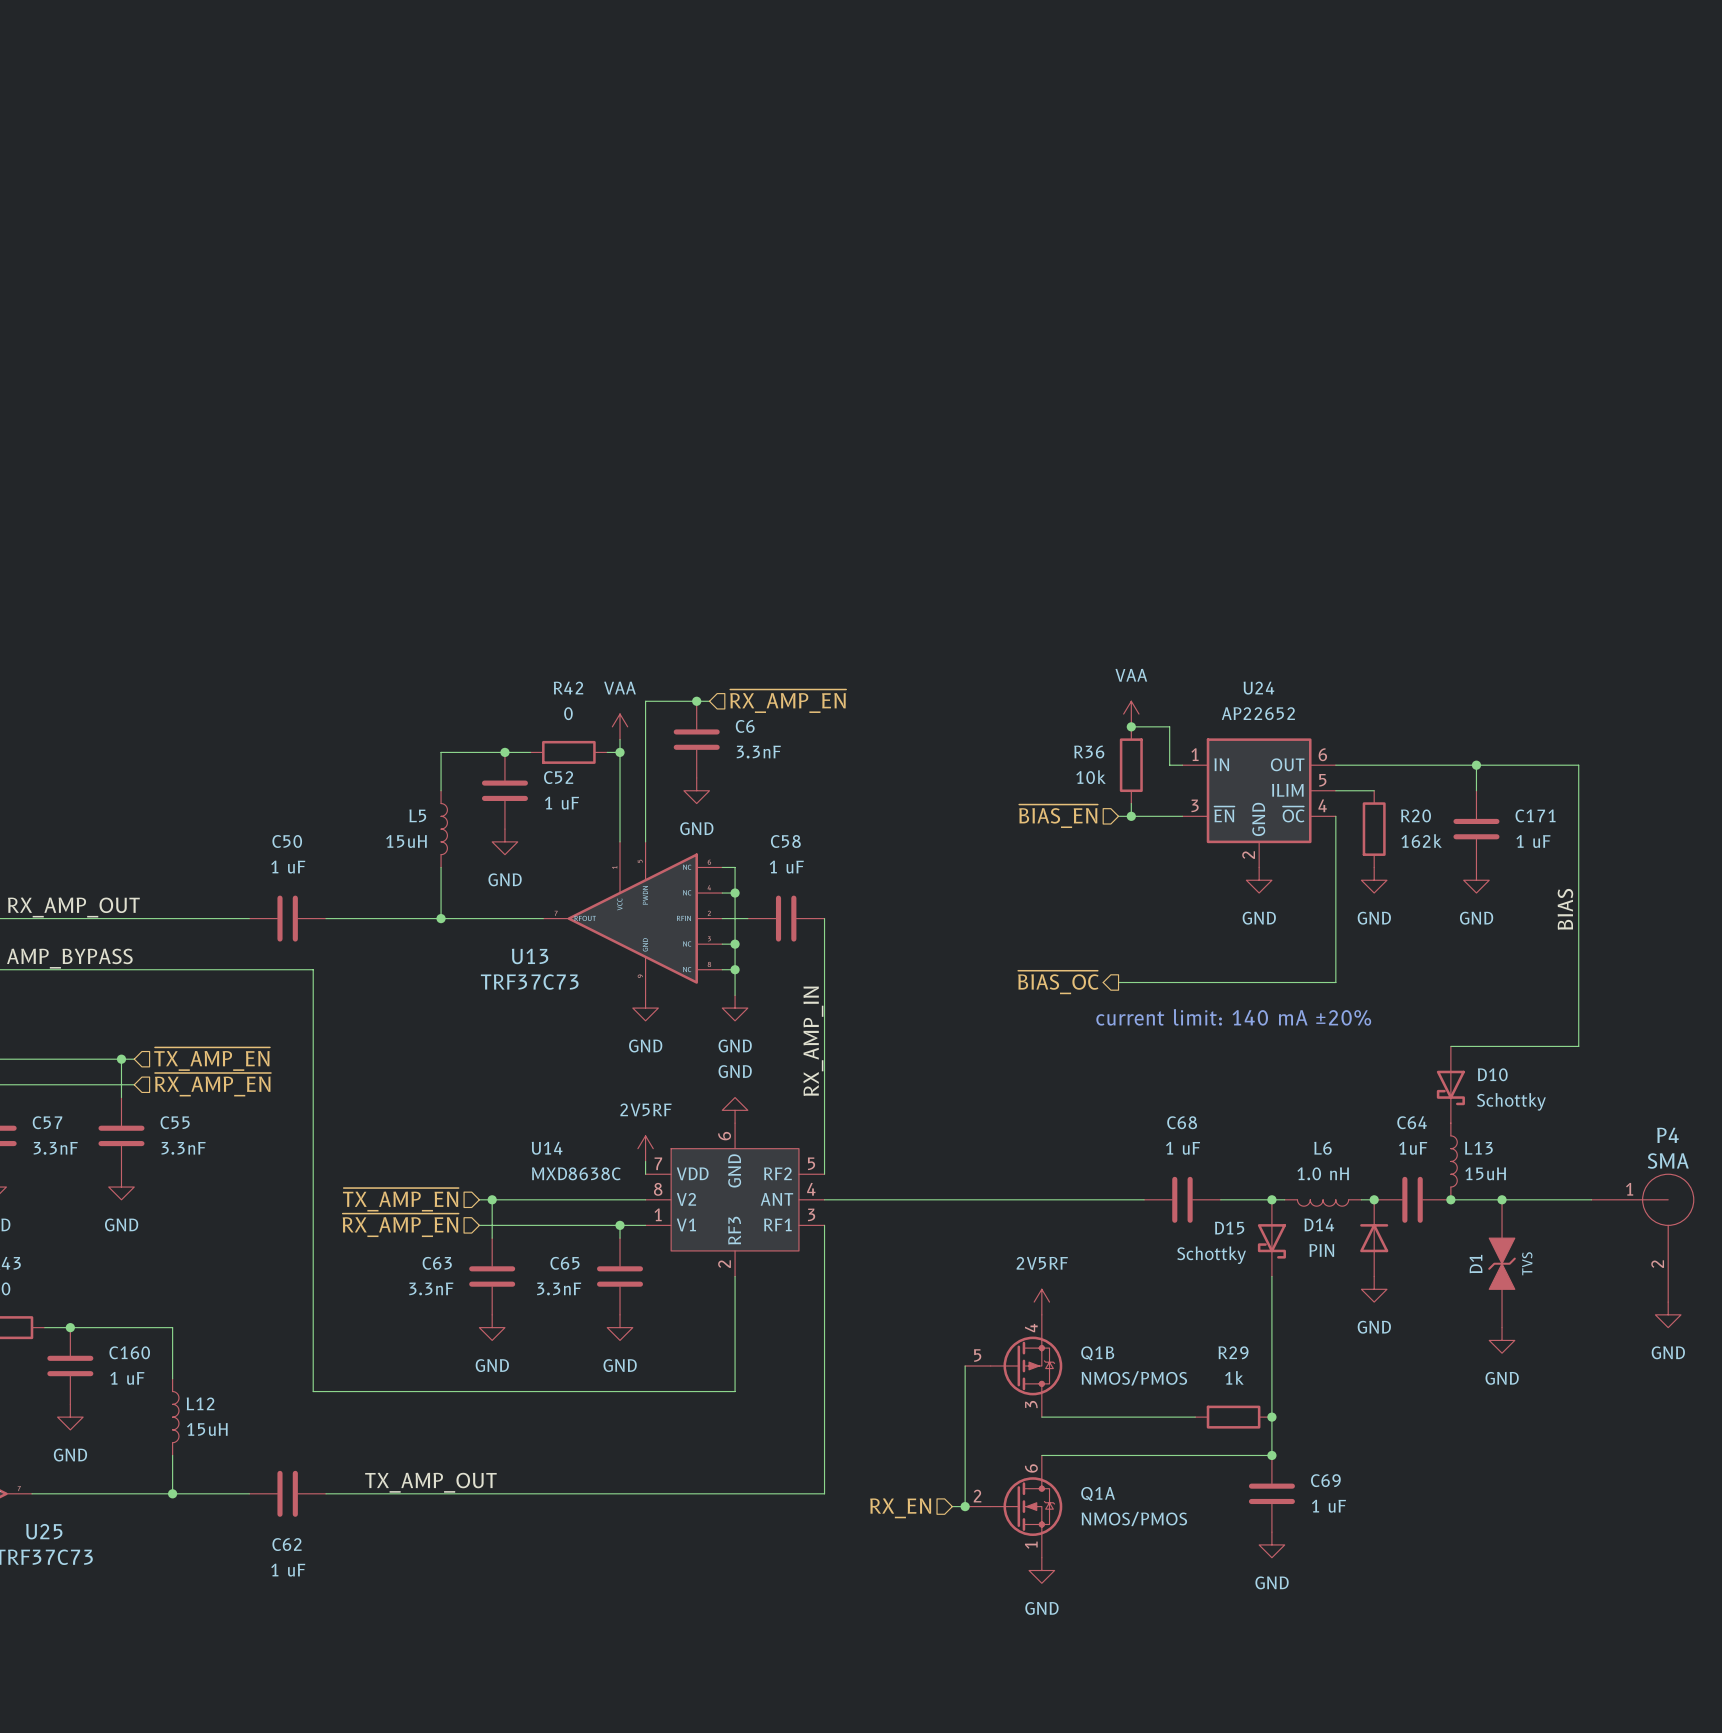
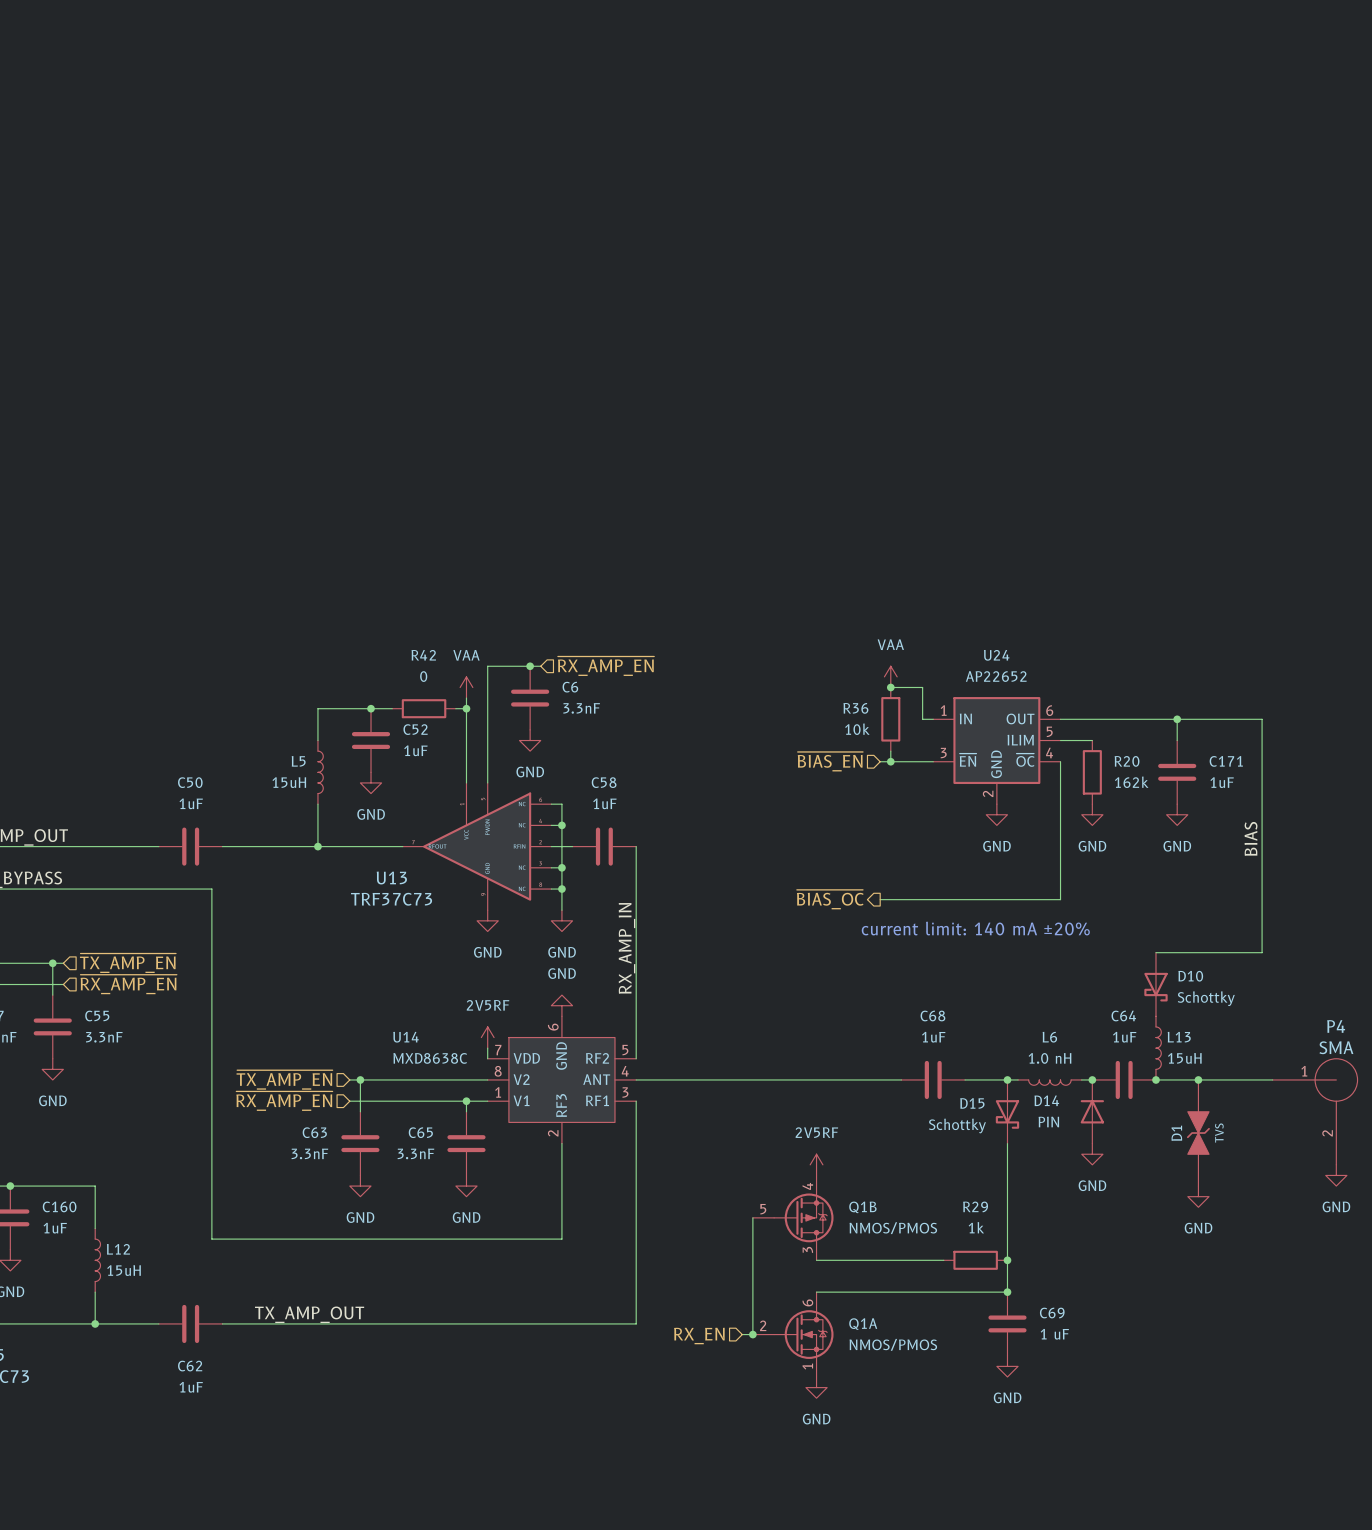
C52 value: 1 uF (561, 803) -> 1uF (415, 750)
C171 value: 1 uF (1533, 841) -> 1uF (1222, 782)
C50 value: 1 uF (288, 867) -> 1uF (191, 803)
C58 value: 1 uF (786, 867) -> 1uF (604, 803)
C68 value: 1 uF (1183, 1148) -> 1uF (933, 1037)
C160 value: 1 uF (127, 1378) -> 1uF (55, 1228)
C62 value: 1 uF (288, 1570) -> 1uF (191, 1387)

